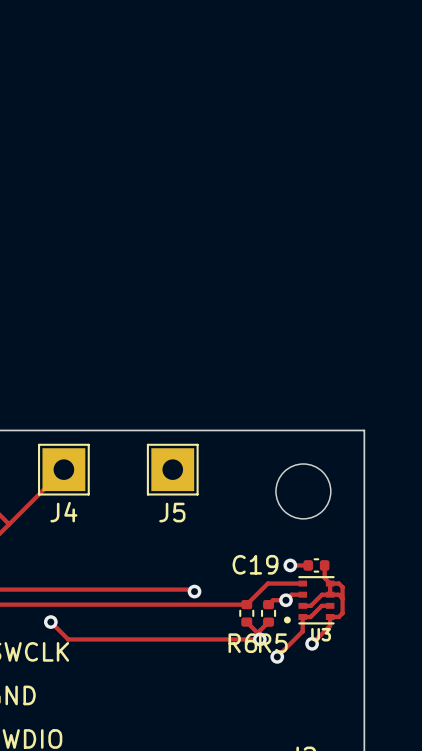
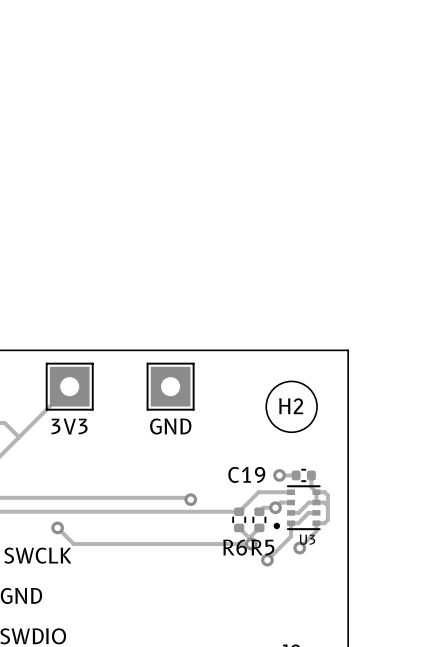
H2 name: none -> H2 (291, 406)
J4 name: J4 (63, 512) -> 3V3 (69, 426)
J5 name: J5 (172, 512) -> GND (170, 426)

